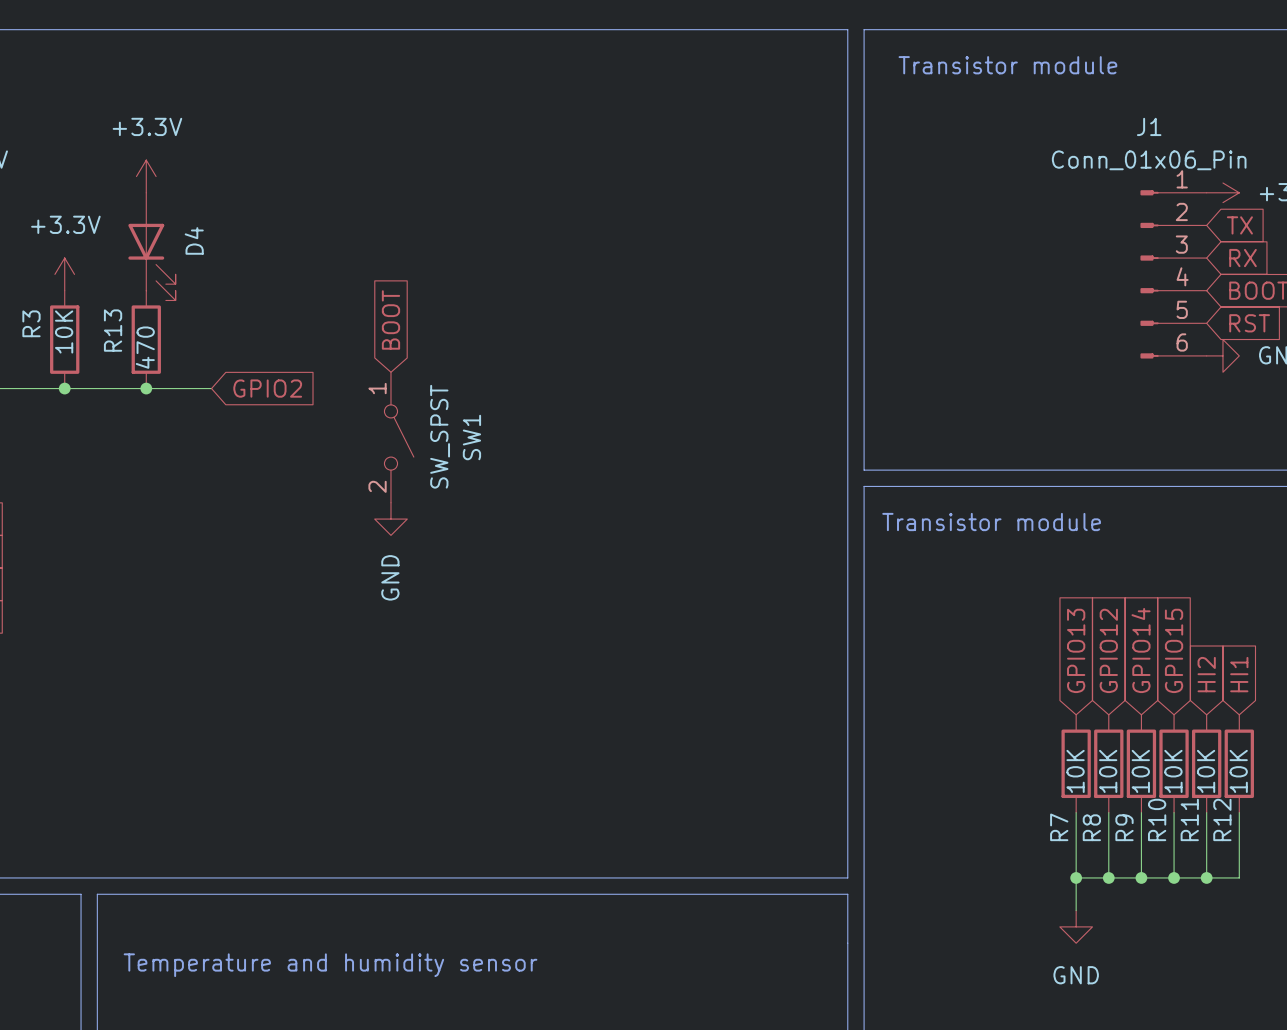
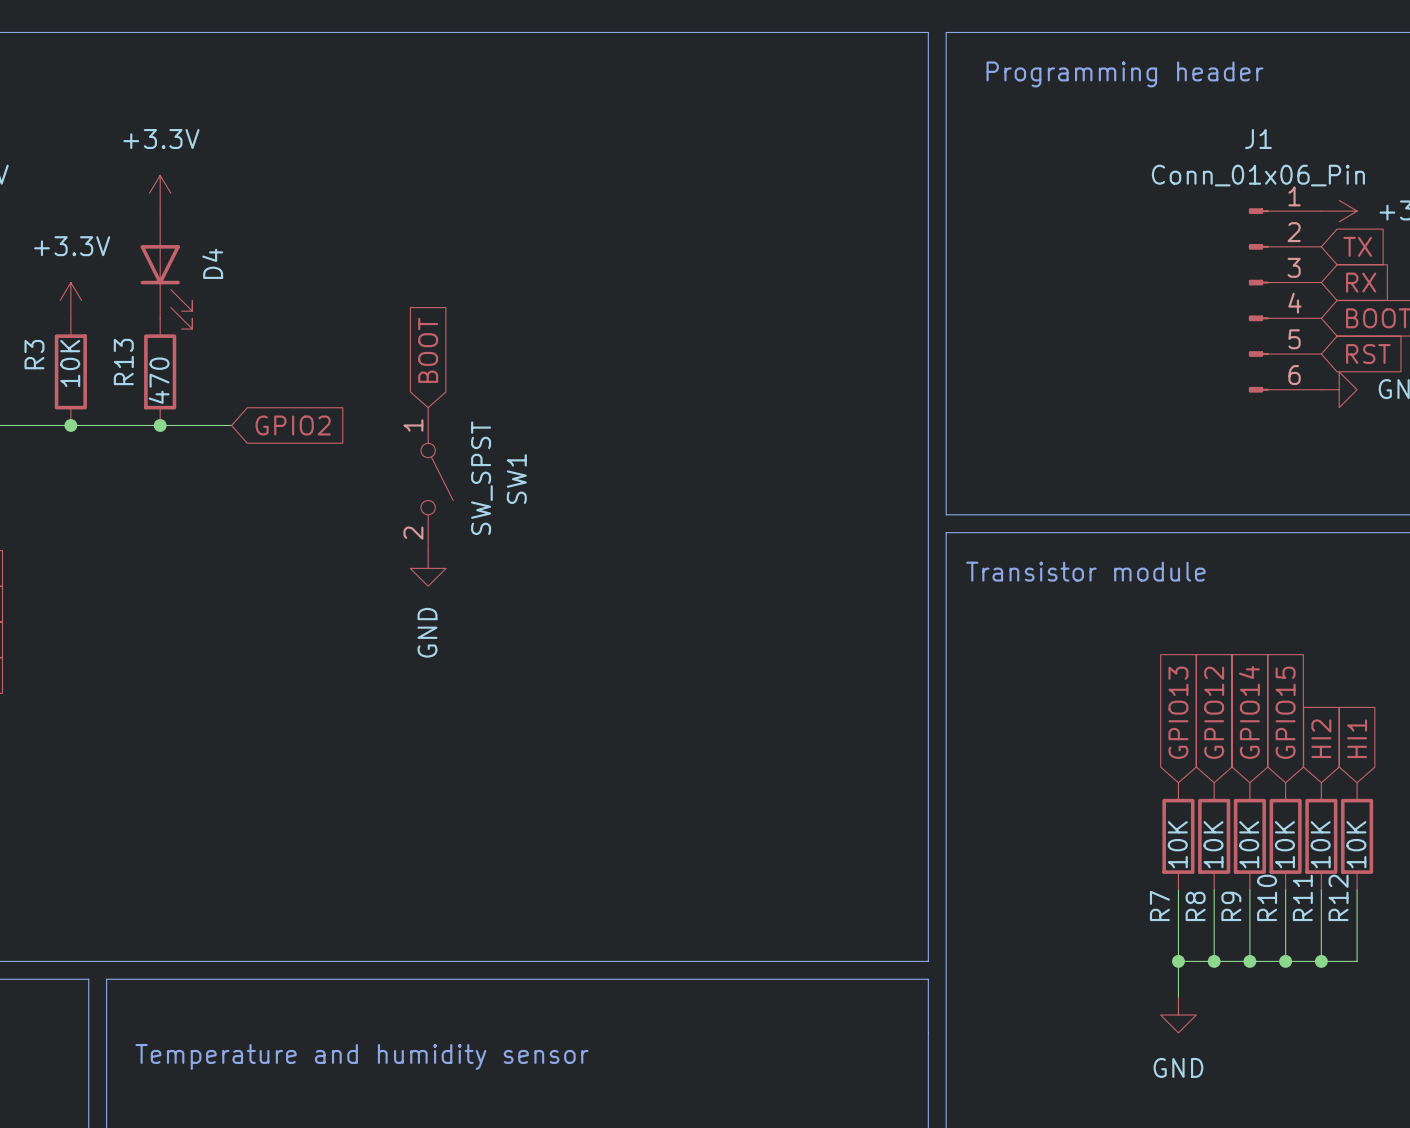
text: Transistor module (1007, 65) -> Programming header (1124, 74)

